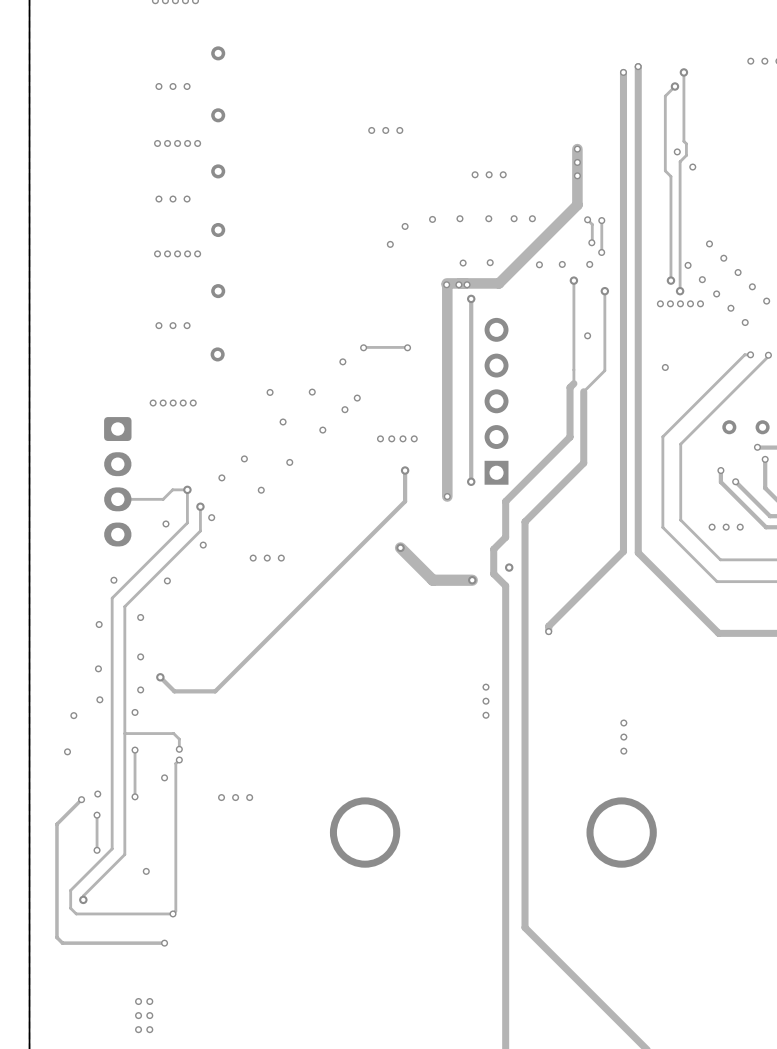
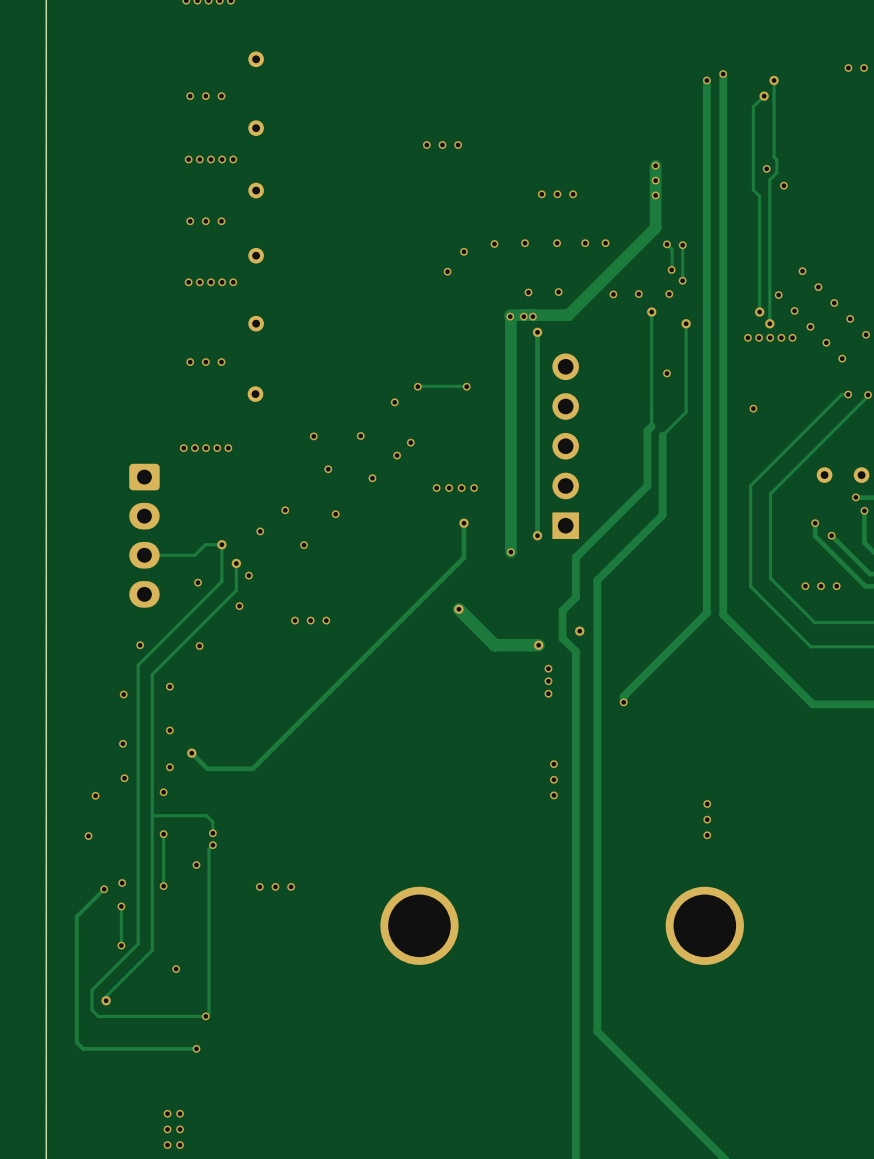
via: none -> (548, 668)
via: none -> (548, 681)
via: none -> (548, 693)

